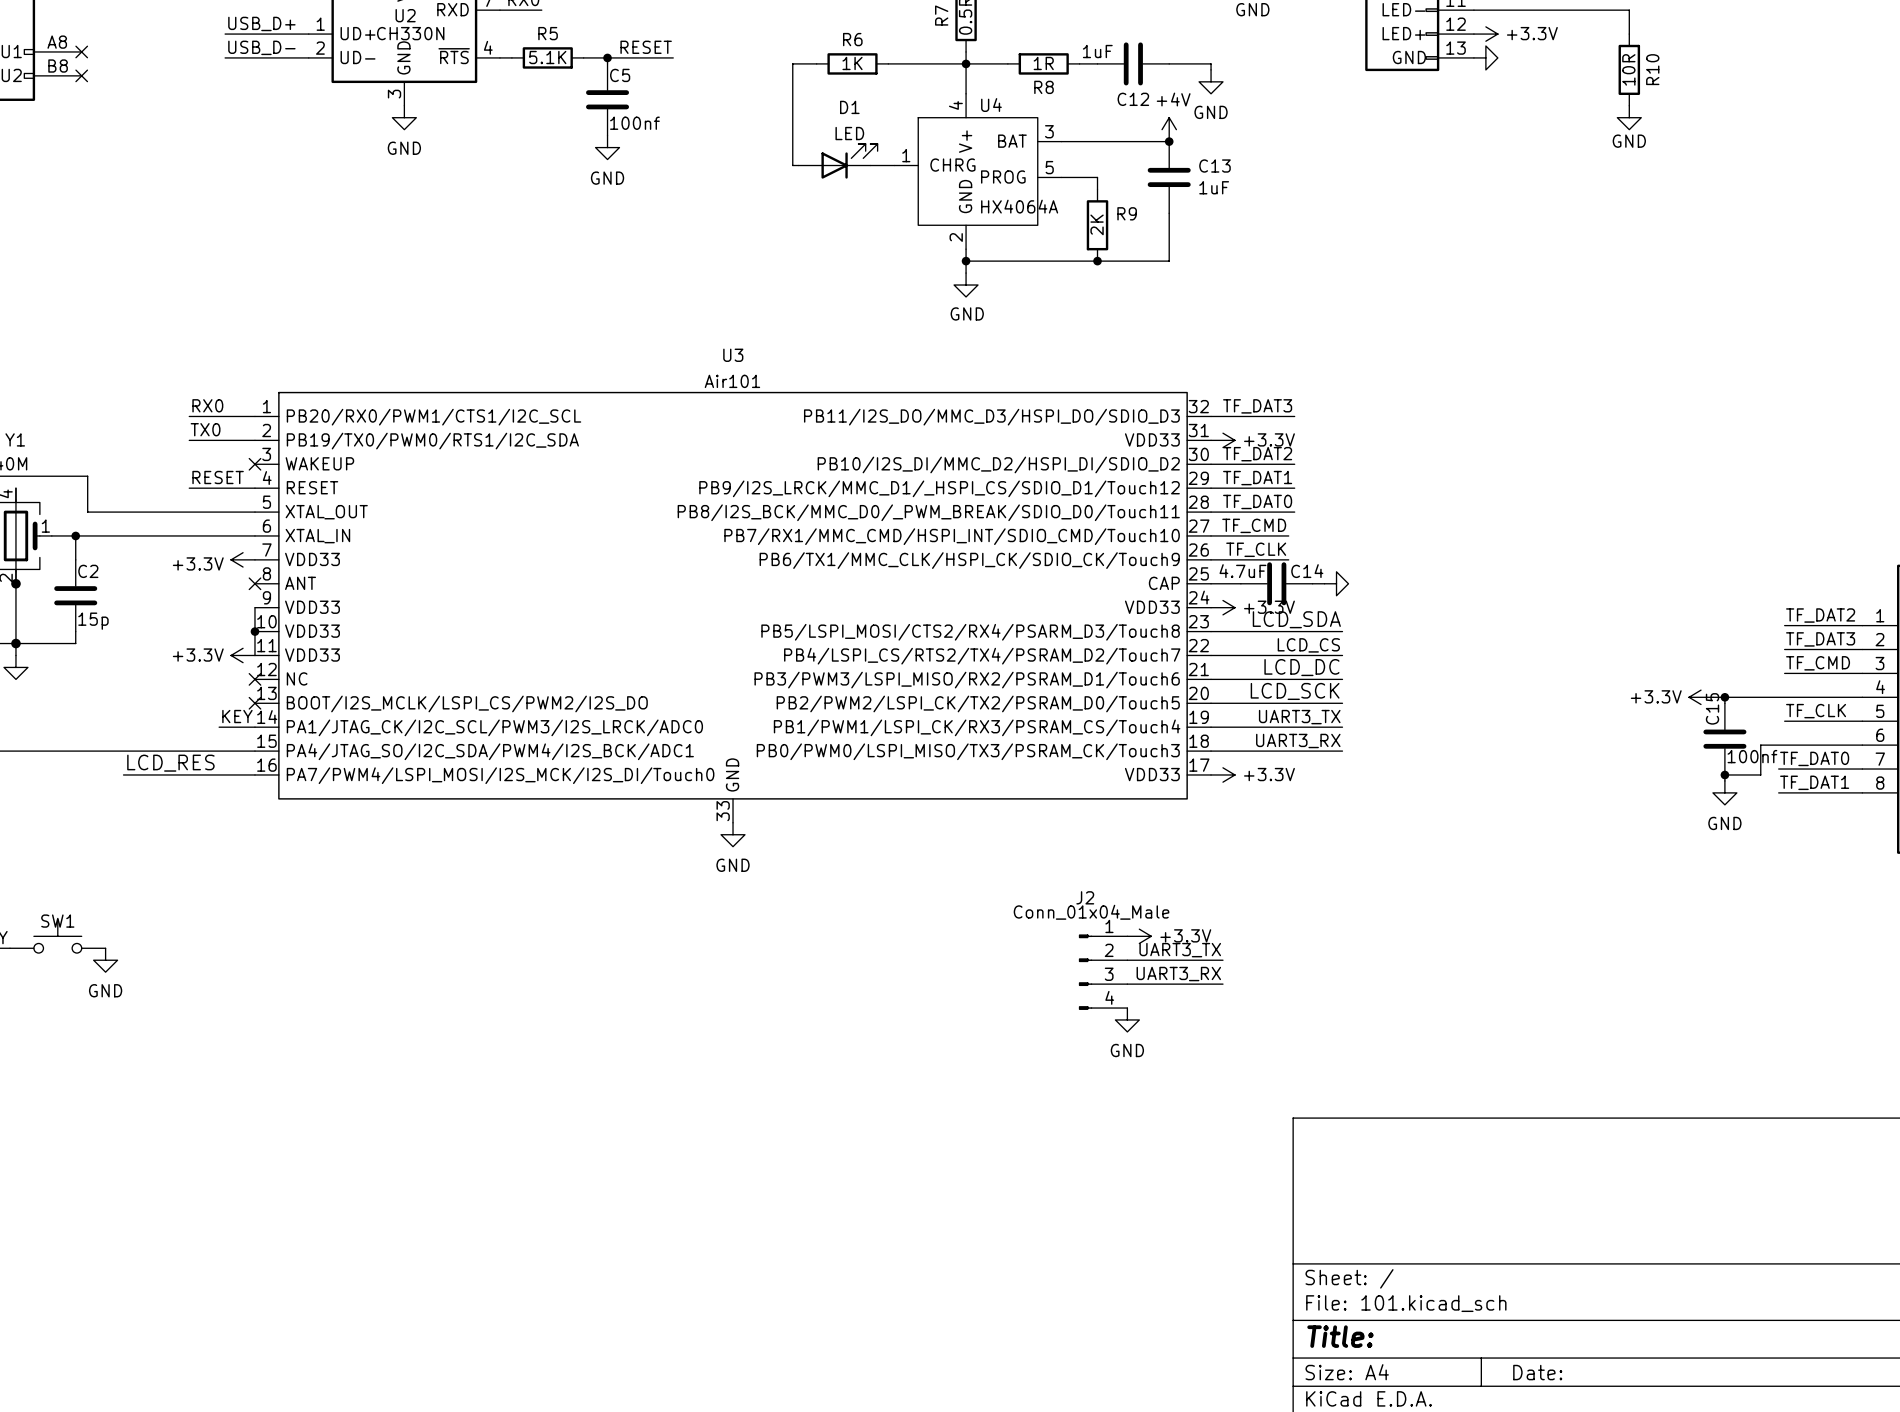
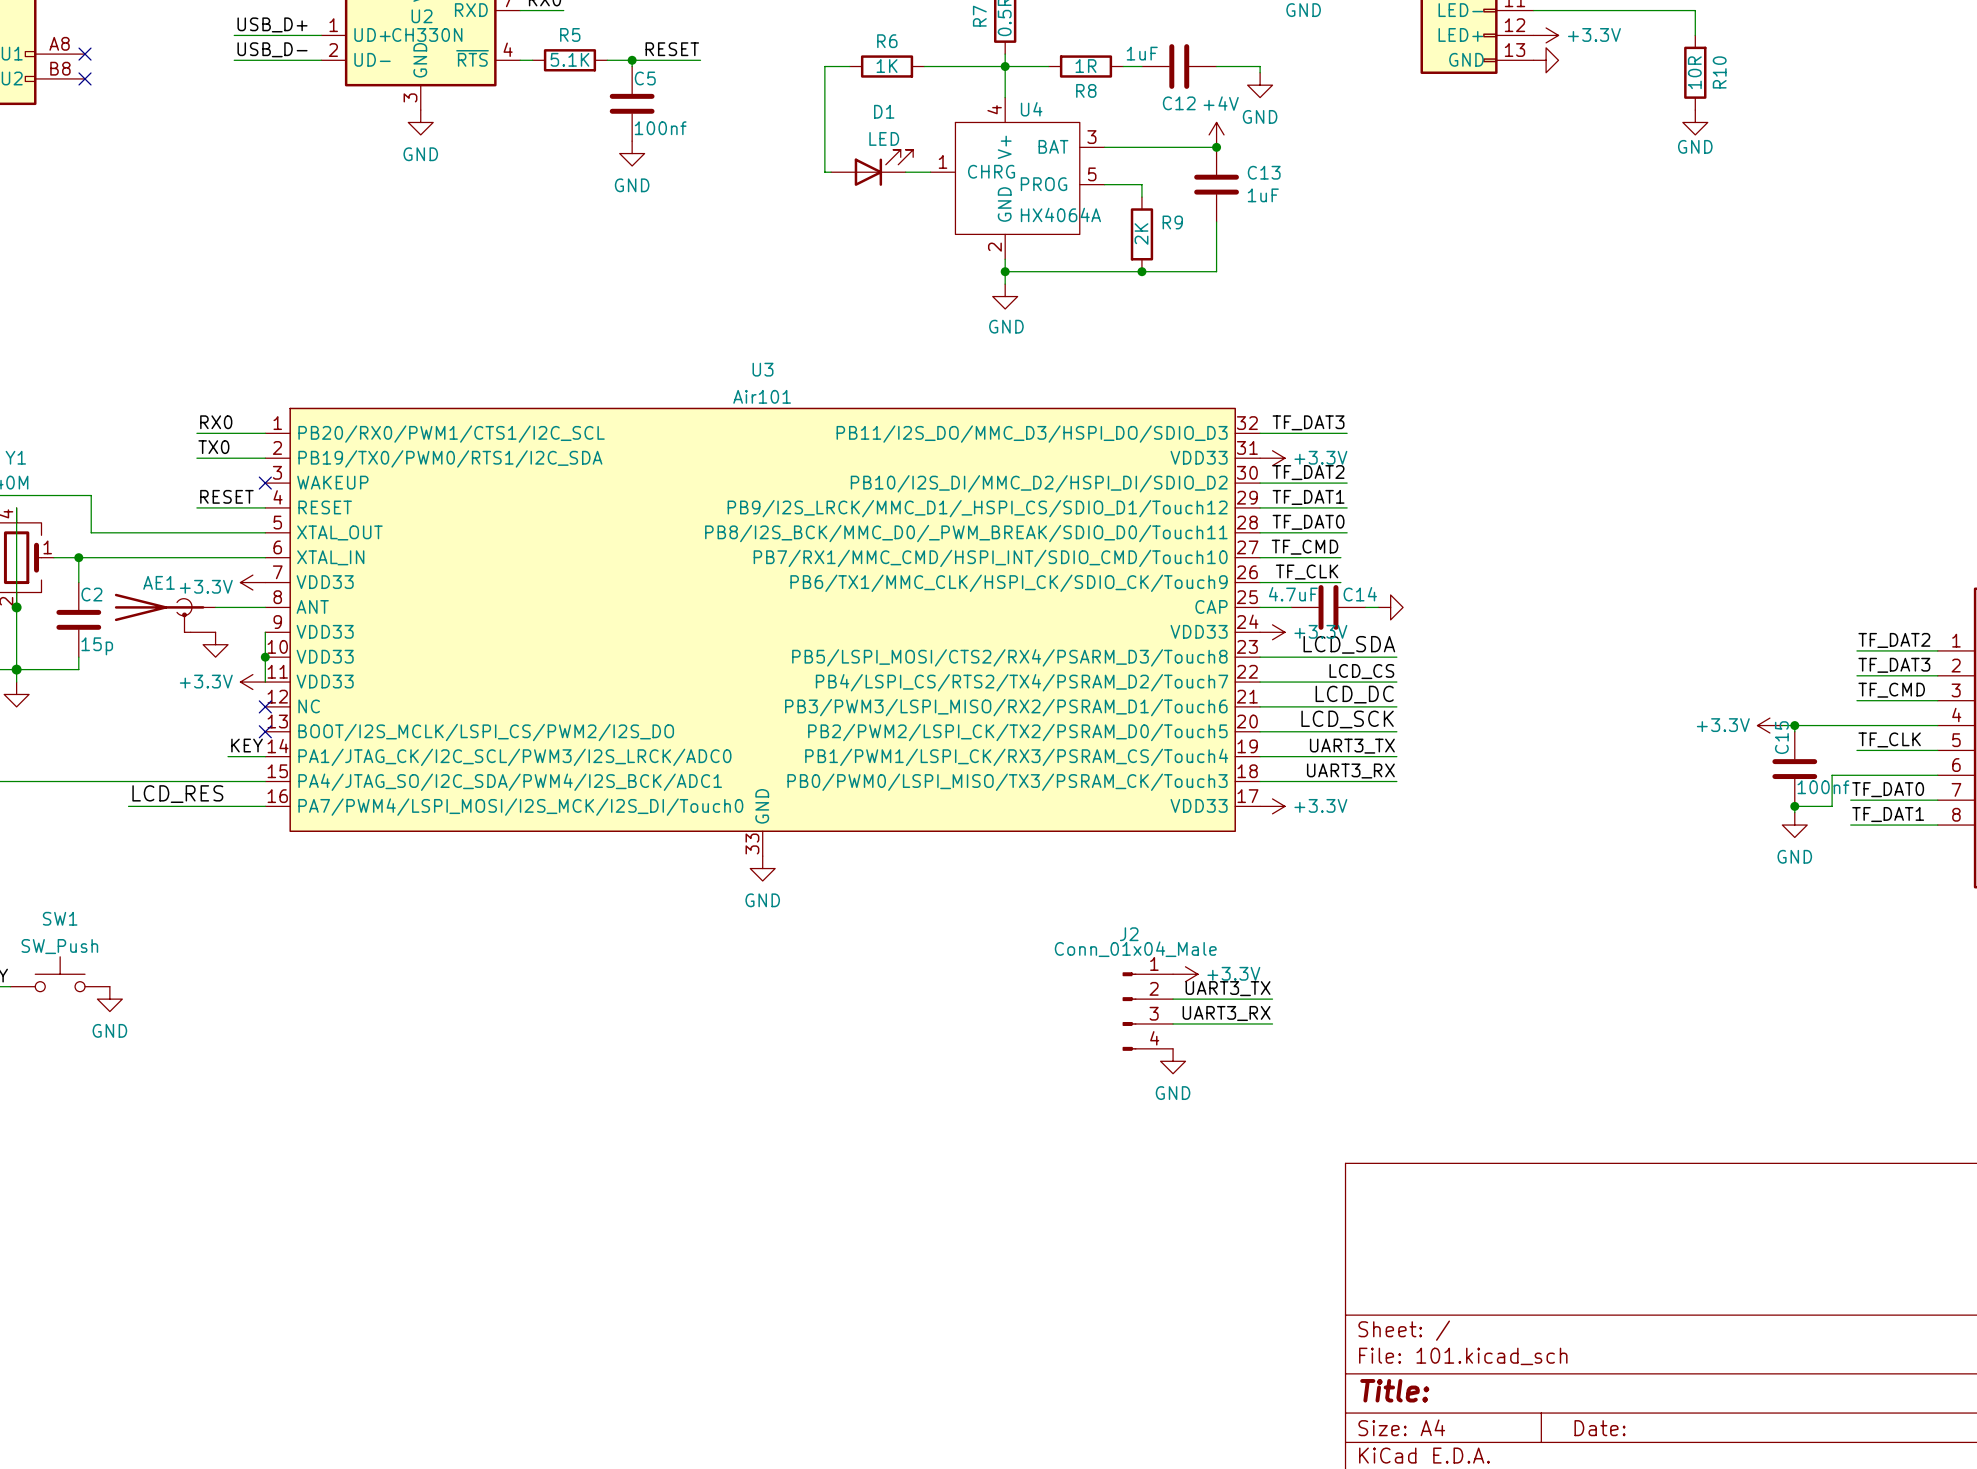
wire: none -> (215, 607) (265, 607)
no-connect mark: (254, 583) -> none
AE1: none -> (165, 613)
power symbol: none -> (215, 644)
SW1 value: none -> SW_Push (59, 946)
SW1 name position: SW1 (57, 921) -> SW1 (60, 918)

